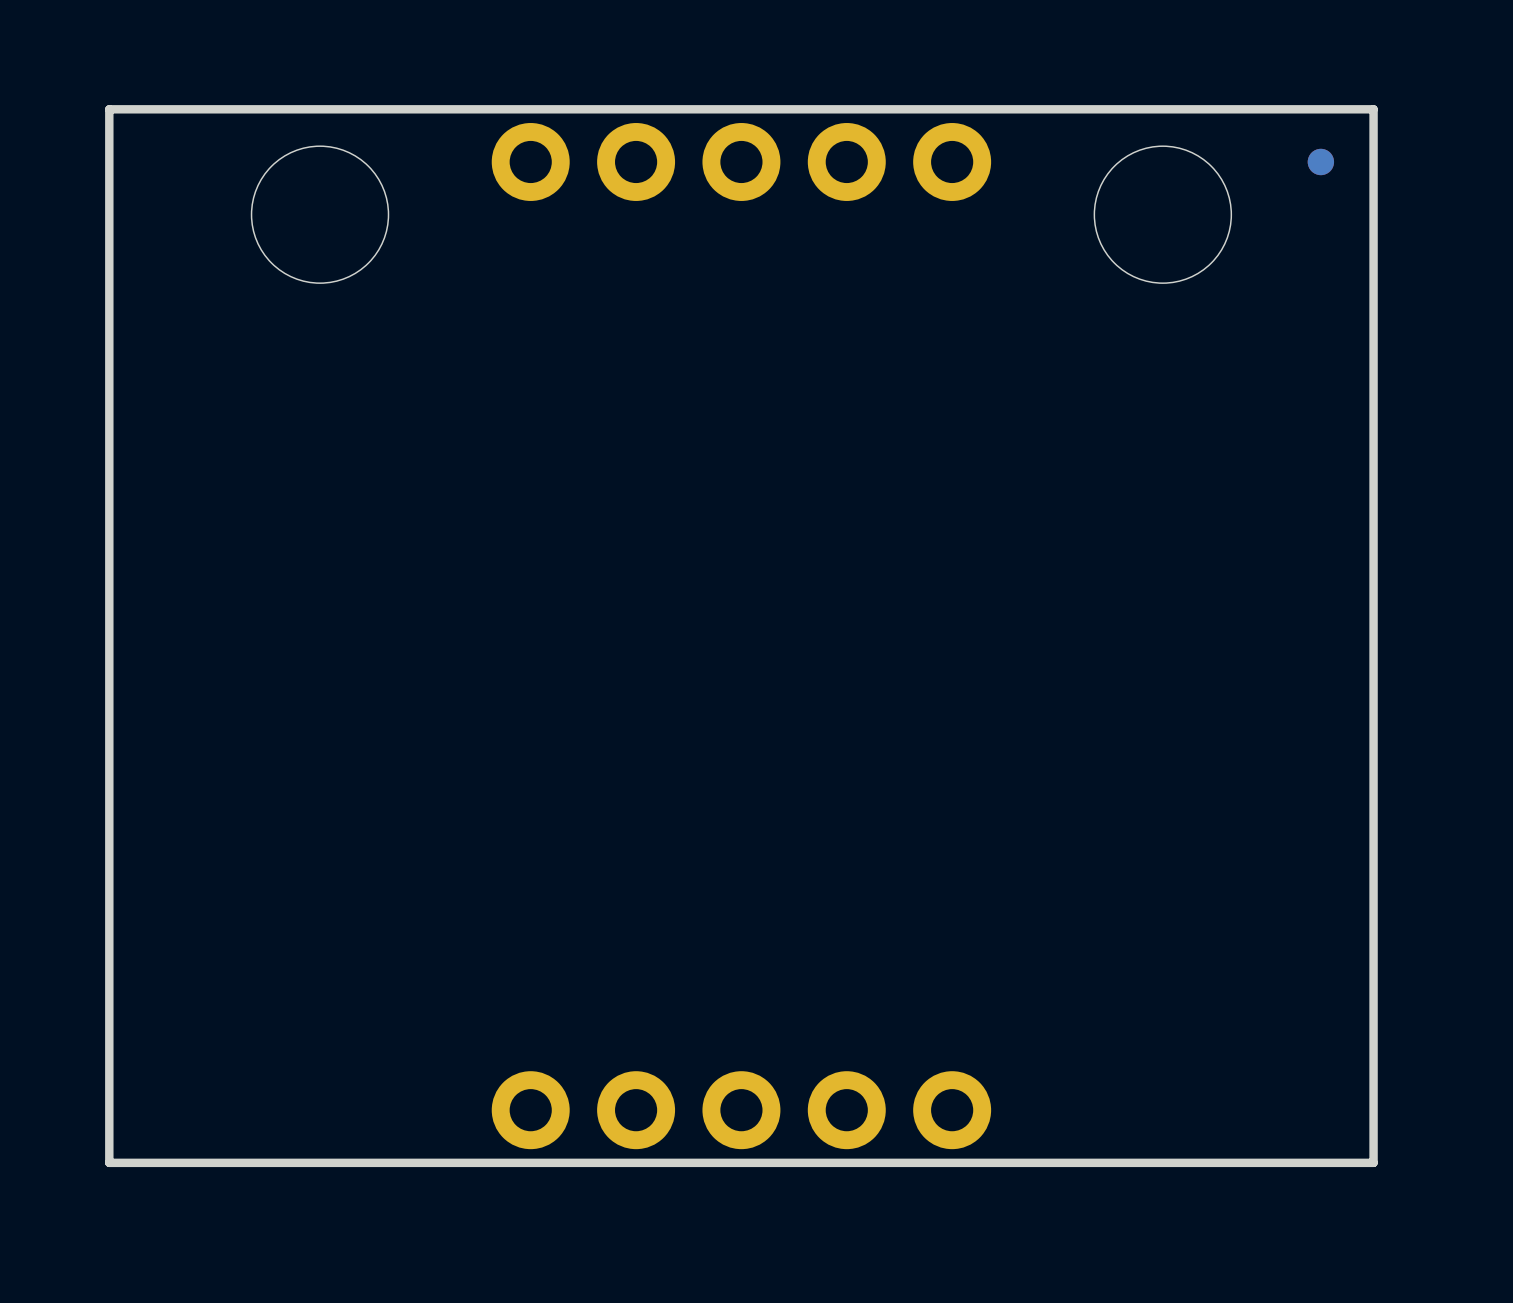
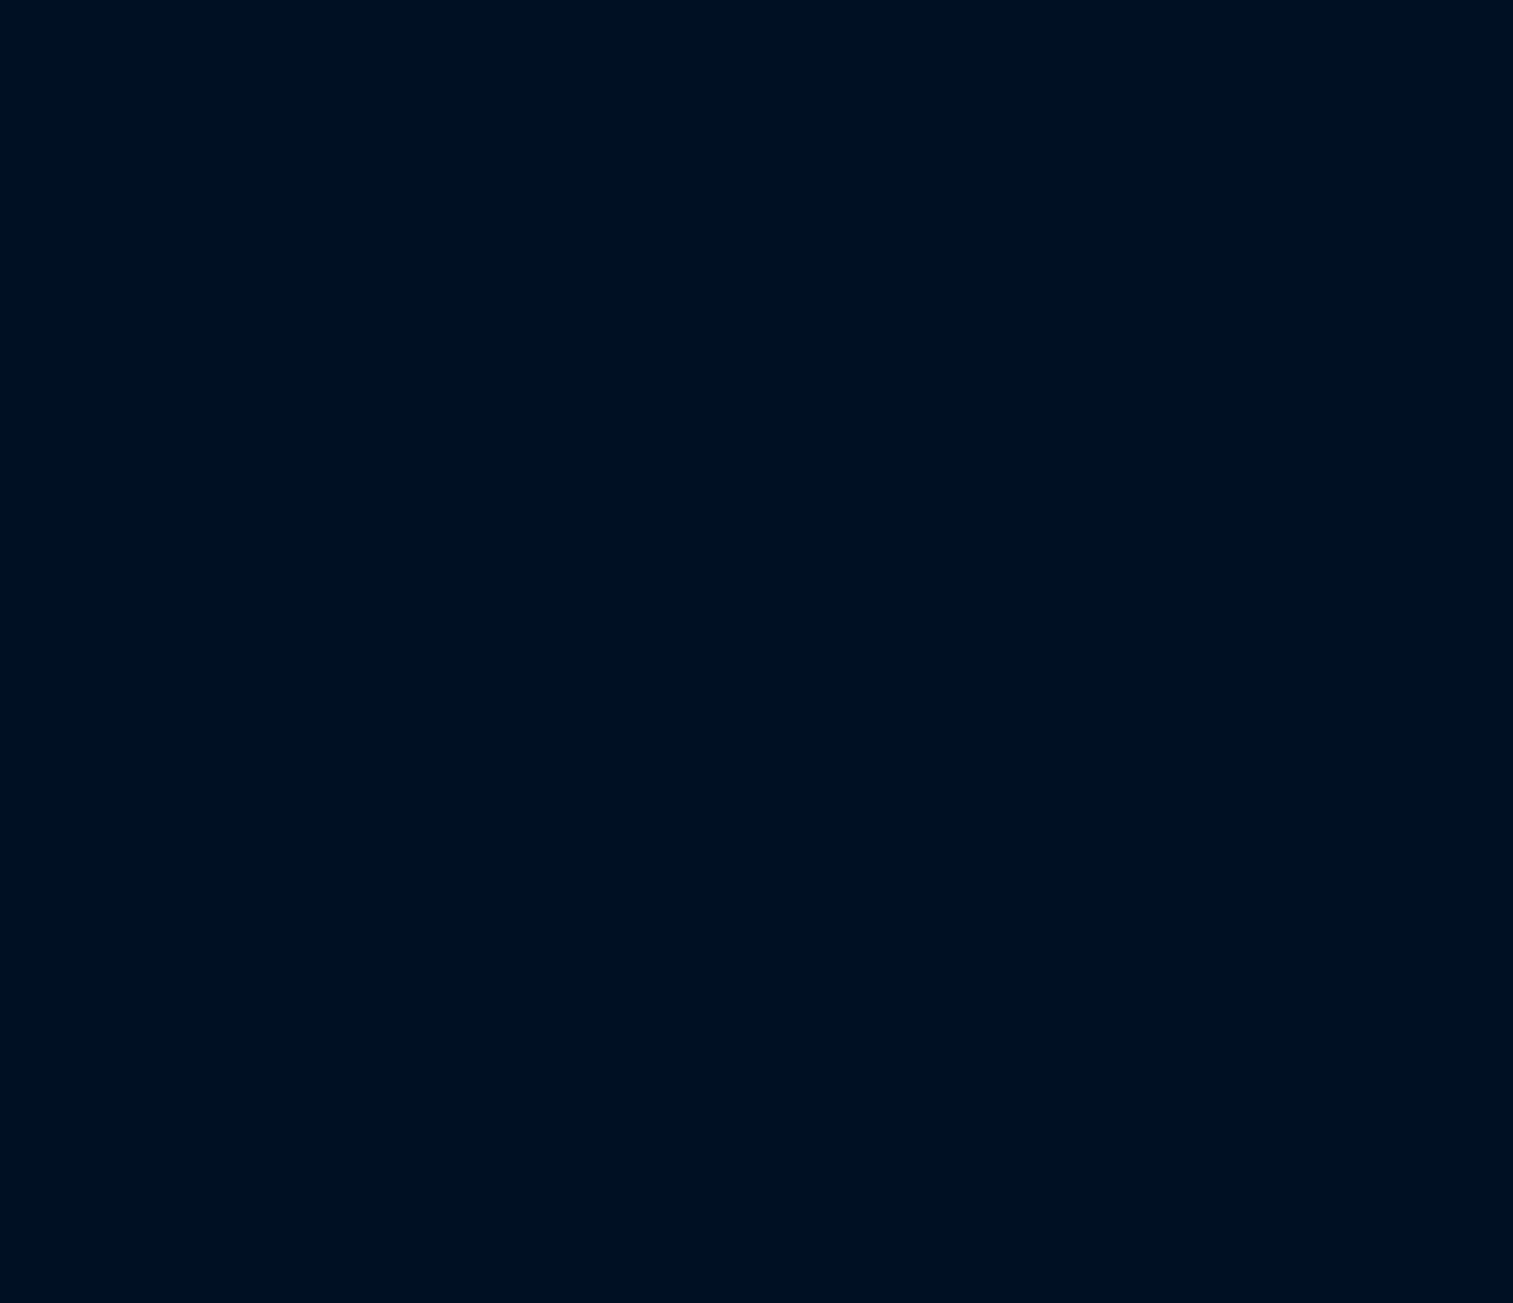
part: (741, 636) -> none

